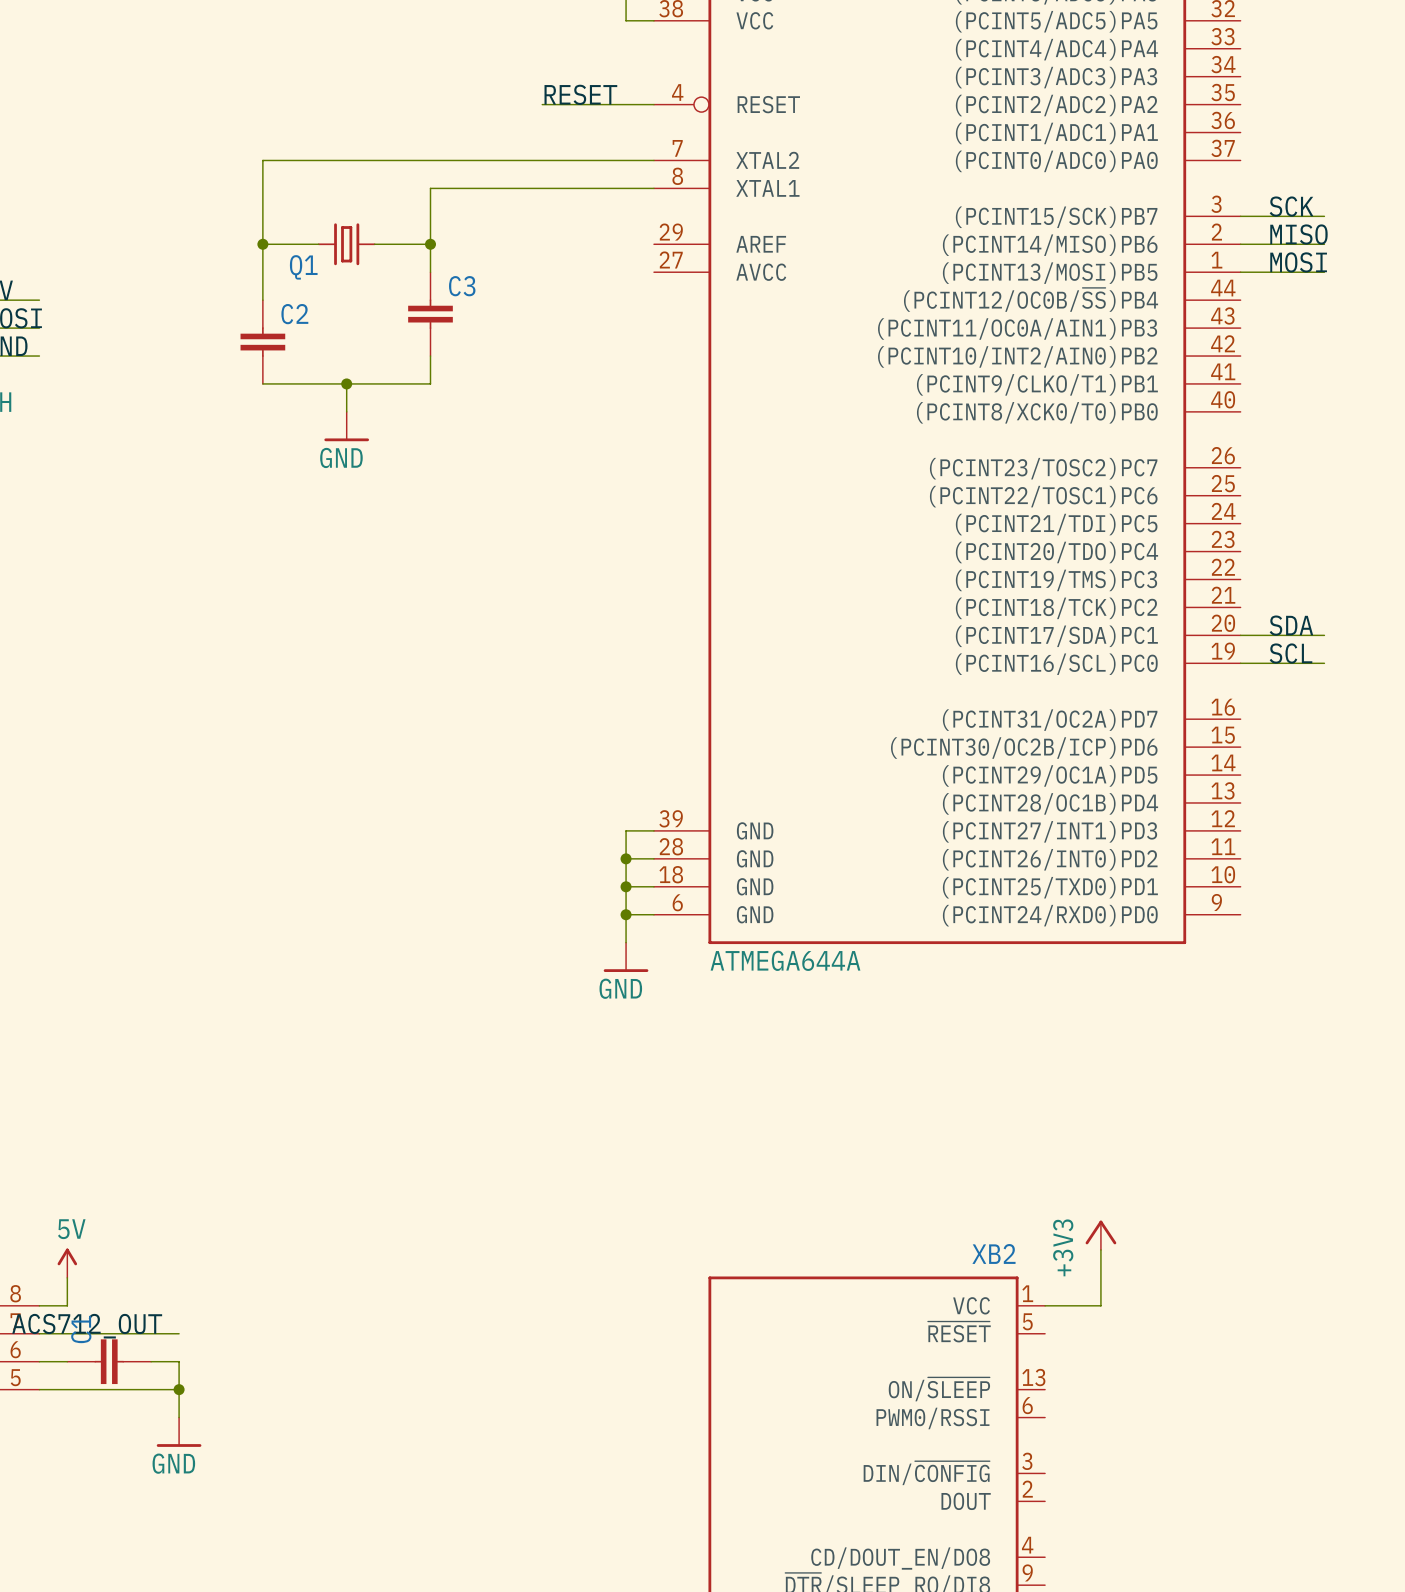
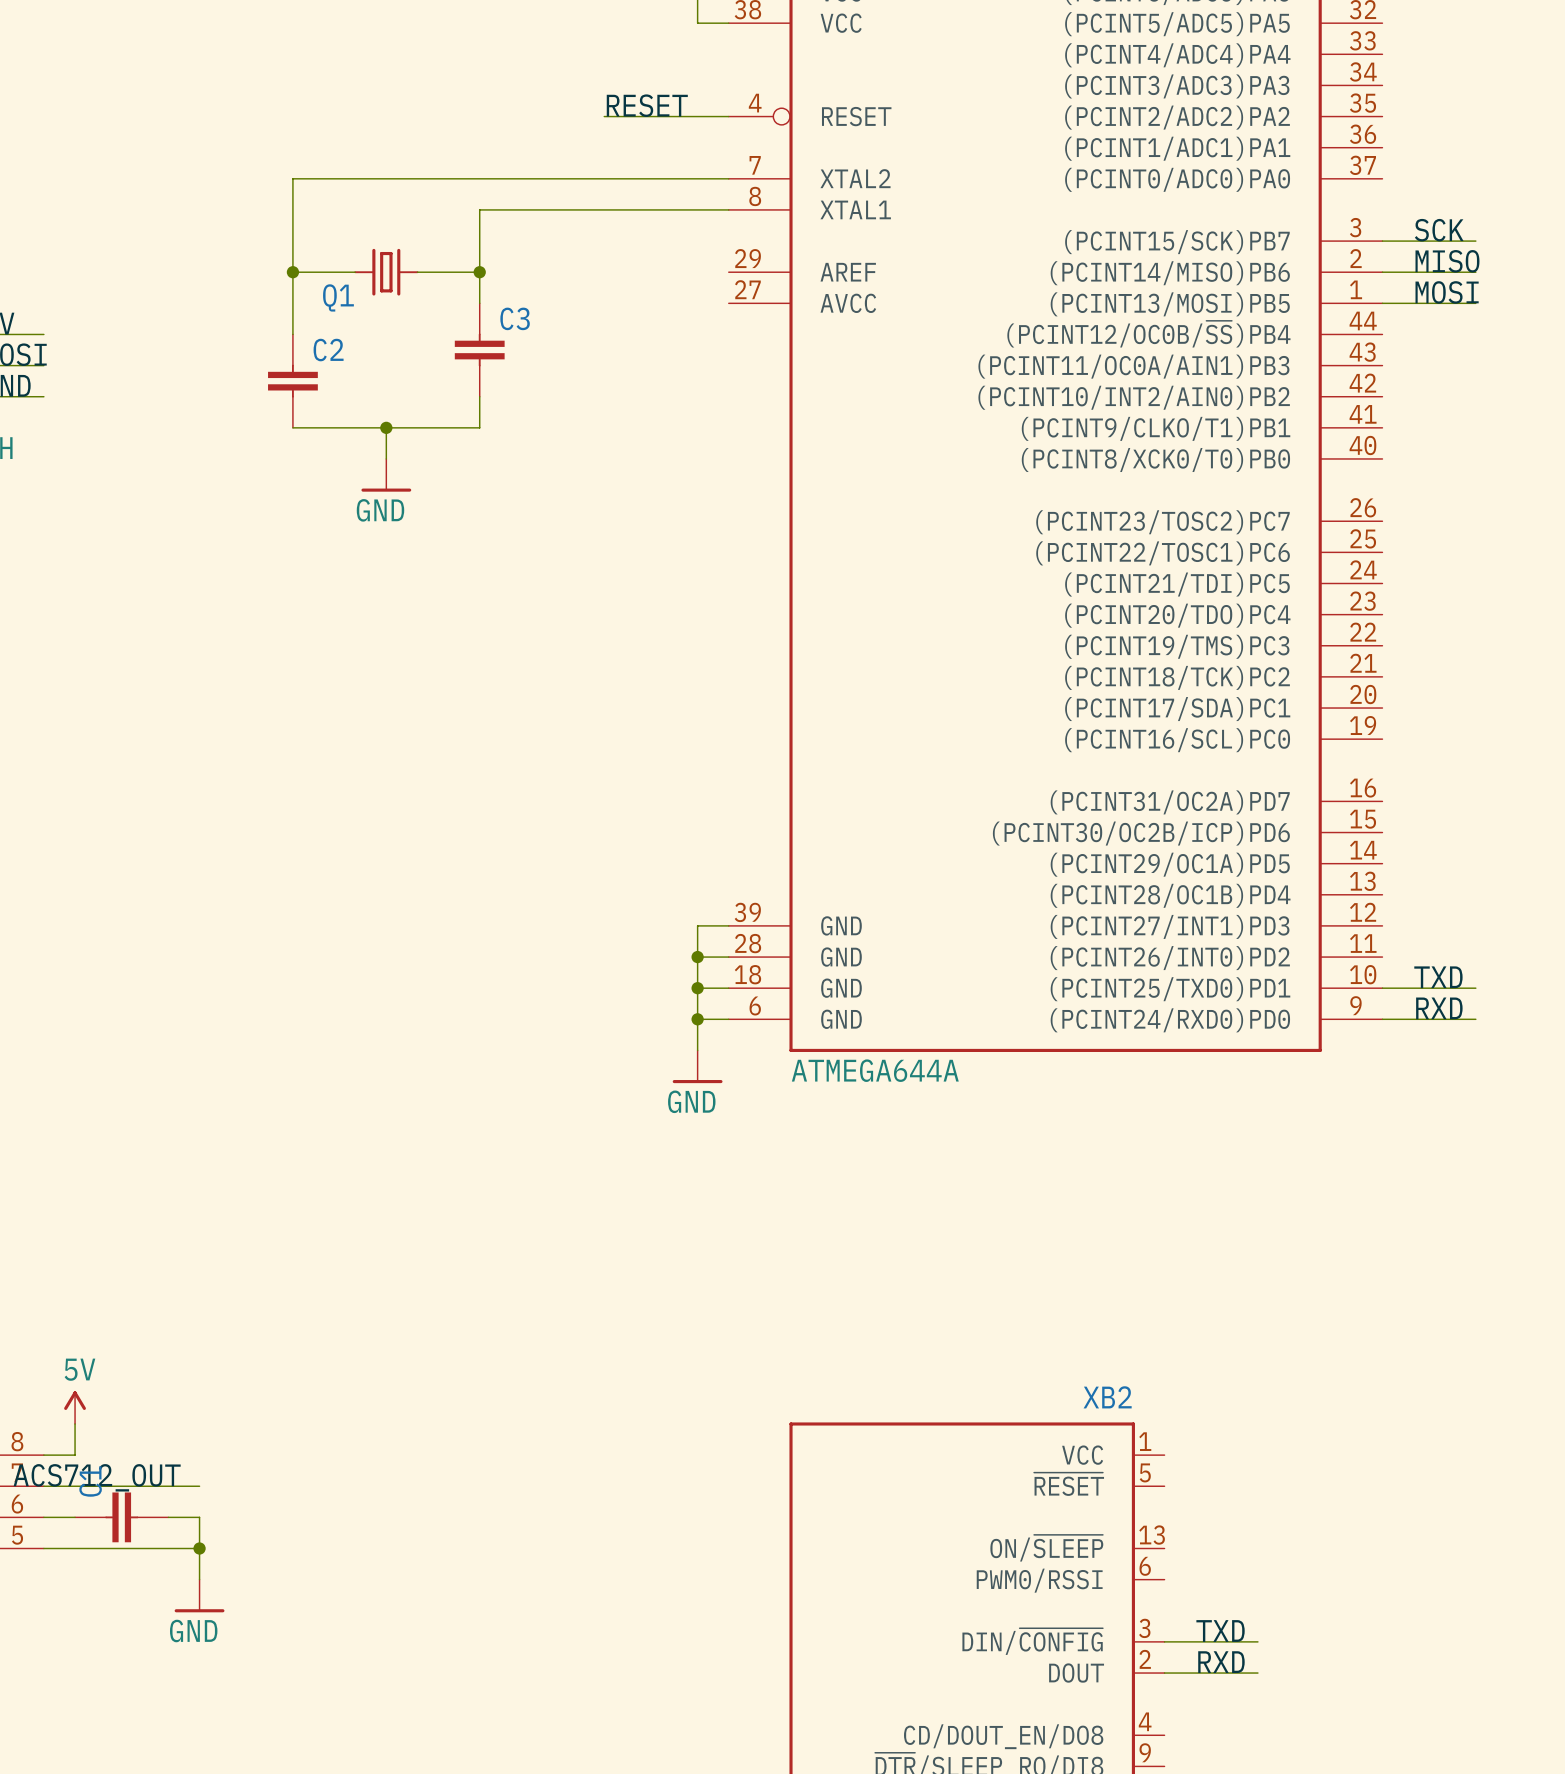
label: SDA (1291, 625) -> none
wire: (1240, 635) (1324, 635) -> (1382, 988) (1475, 988)
label: SCL (1291, 653) -> none
wire: (1240, 663) (1324, 663) -> (1382, 1019) (1475, 1019)
label: none -> TXD (1438, 977)
label: none -> RXD (1439, 1008)
power symbol: +3V3 (1100, 1235) -> none
wire: (1100, 1249) (1100, 1305) (1045, 1305) -> none
label: none -> TXD (1220, 1631)
wire: none -> (1164, 1641) (1257, 1641)
label: none -> RXD (1221, 1662)
wire: none -> (1164, 1673) (1257, 1673)

